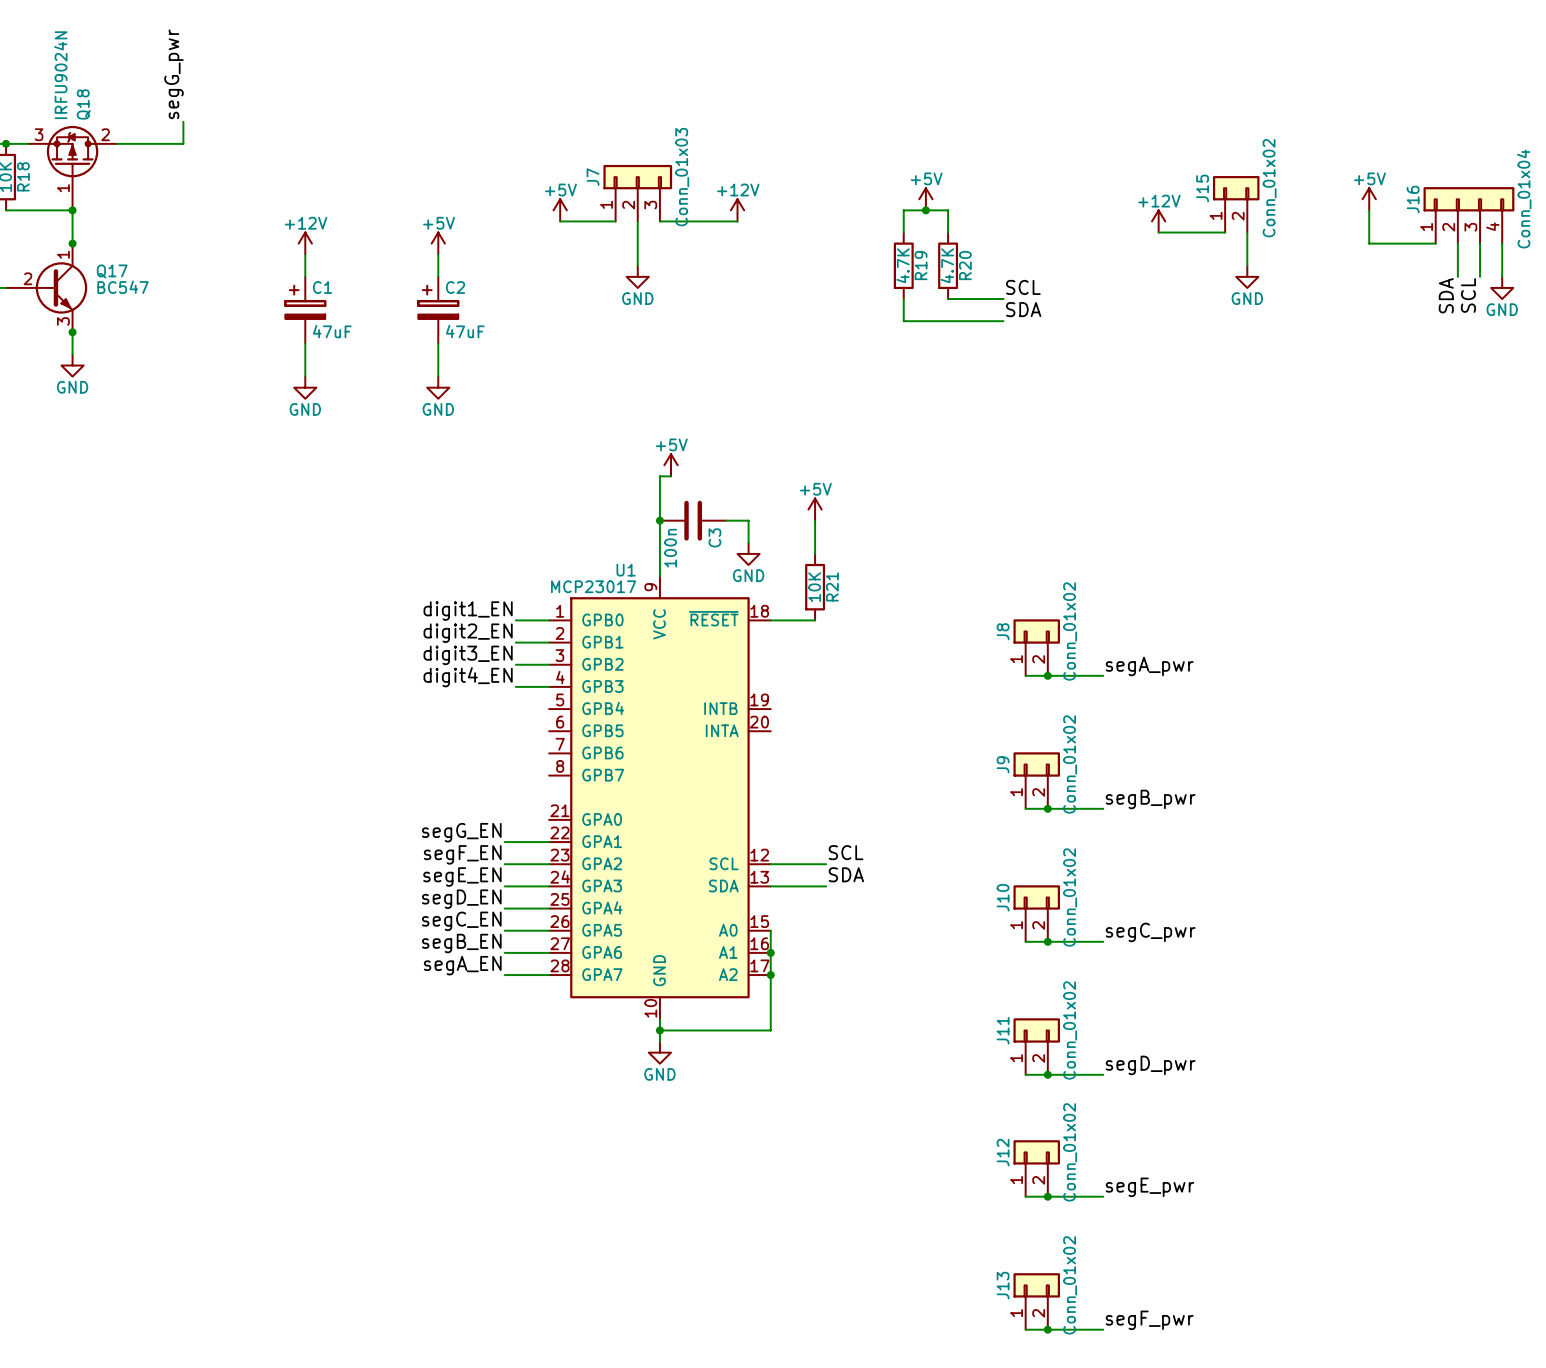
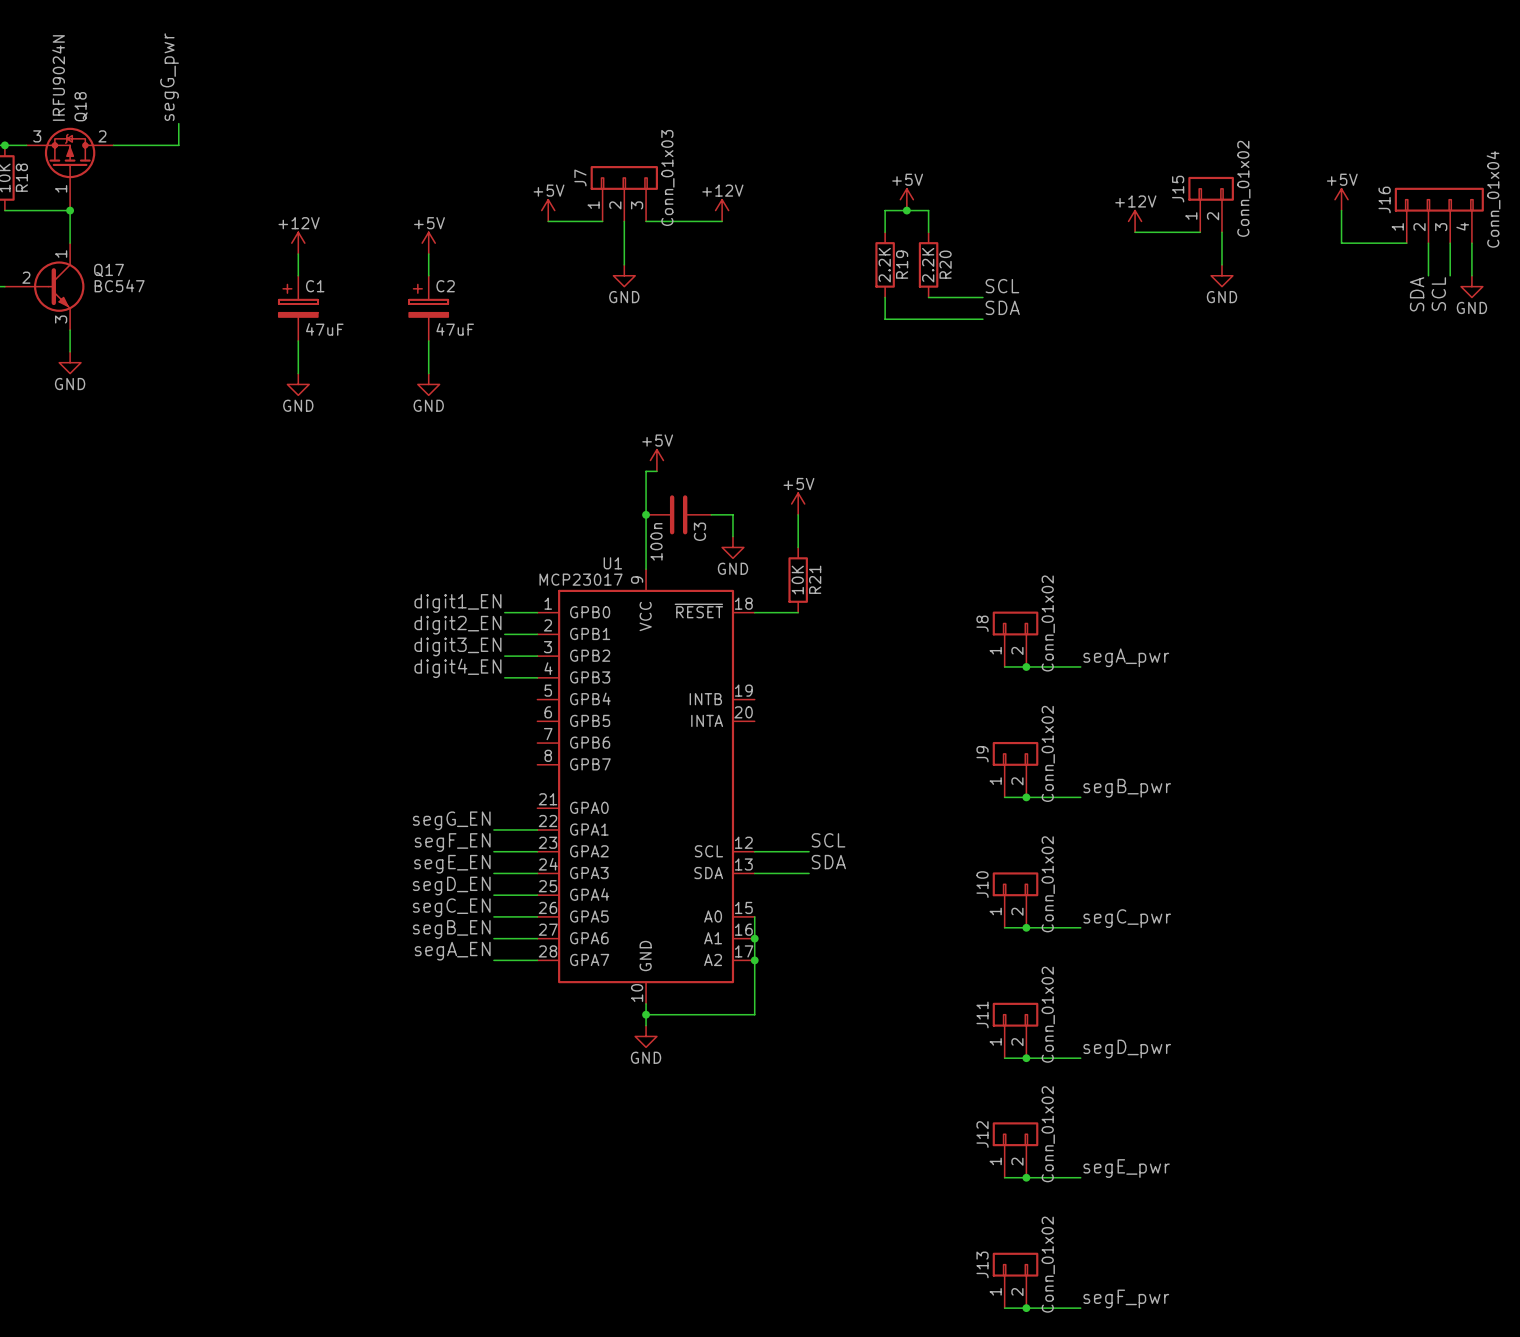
junction: (72, 243) -> none
R19 value: 4.7K (903, 265) -> 2.2K (884, 265)
R20 value: 4.7K (947, 265) -> 2.2K (928, 265)
junction: (72, 332) -> none

